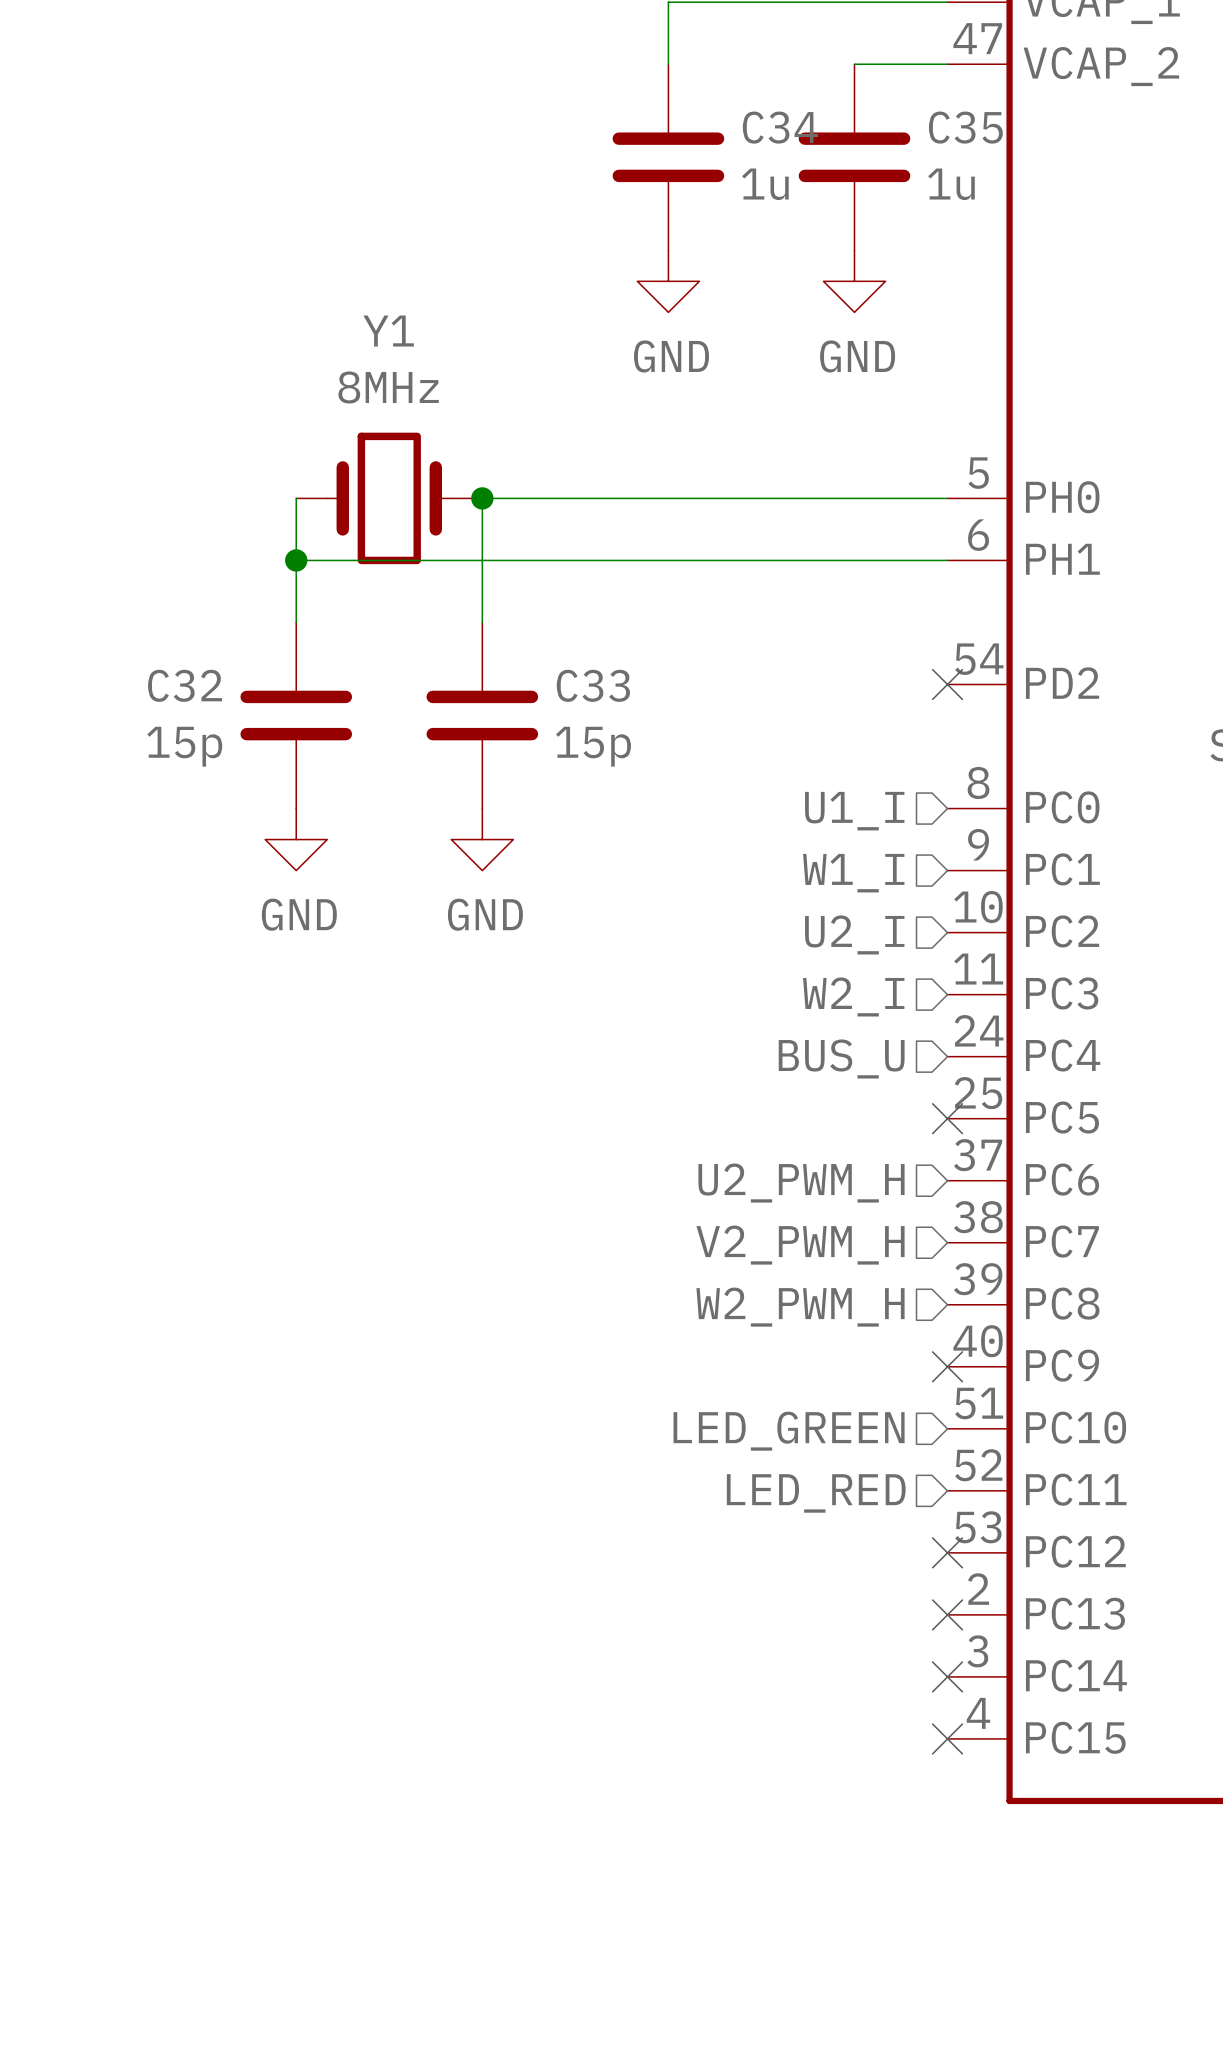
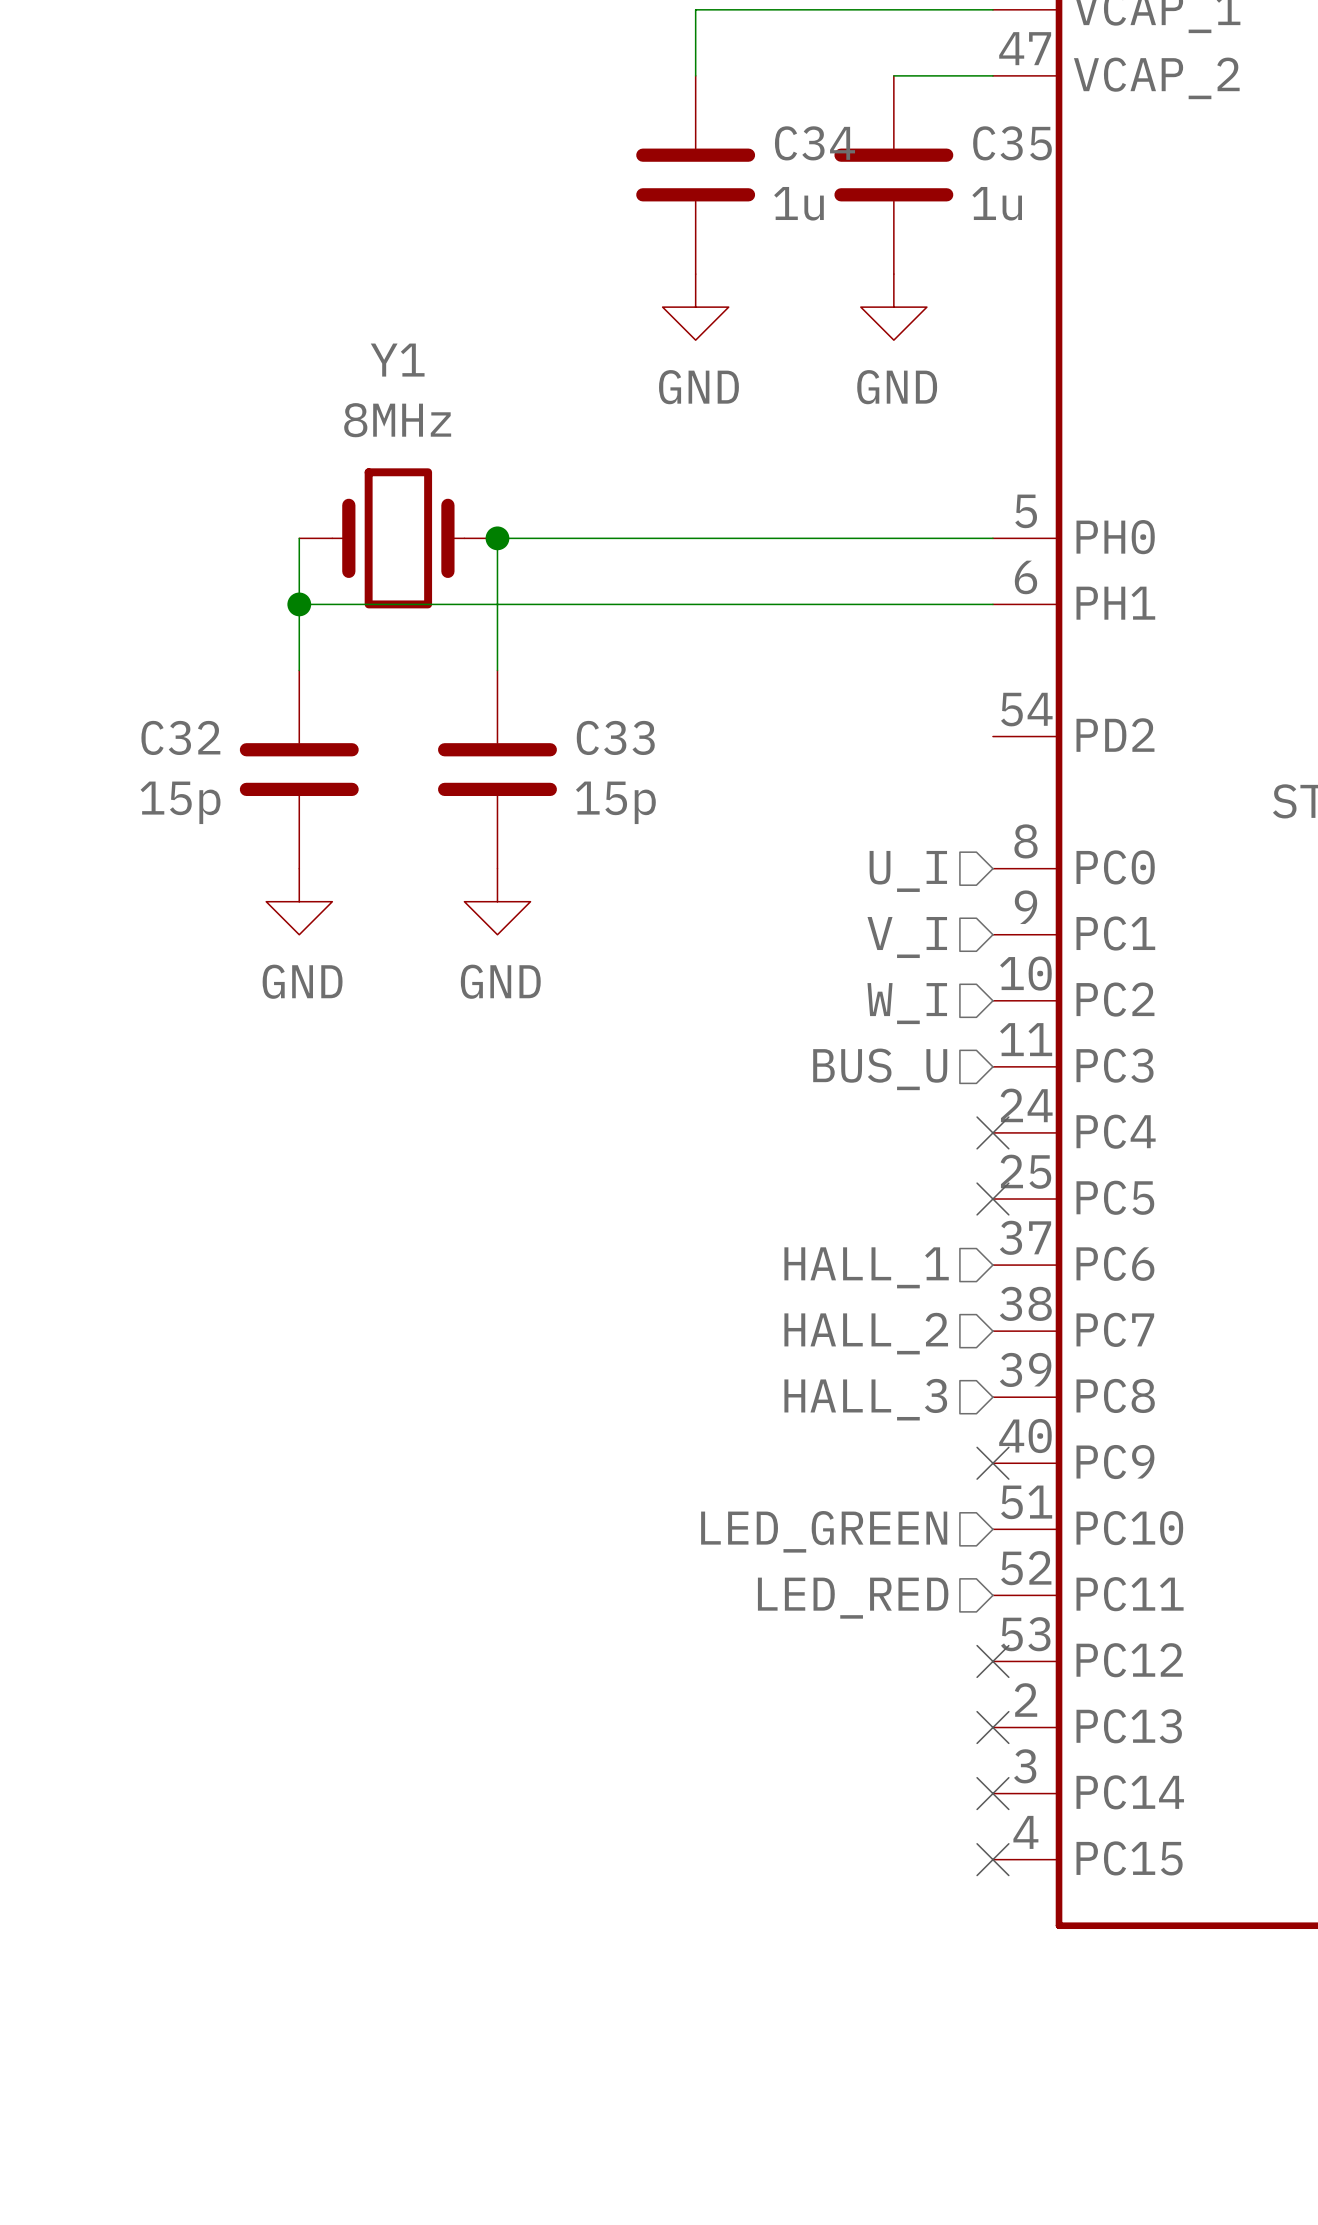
no-connect mark: (947, 684) -> none
hierarchical label: U1_I (854, 811) -> U_I (908, 871)
hierarchical label: W1_I (853, 873) -> V_I (907, 937)
hierarchical label: U2_I (854, 934) -> W_I (907, 1003)
hierarchical label: W2_I (853, 996) -> BUS_U (880, 1069)
no-connect mark: none -> (992, 1132)
hierarchical label: BUS_U (841, 1058) -> none
hierarchical label: U2_PWM_H (801, 1183) -> HALL_1 (866, 1267)
hierarchical label: V2_PWM_H (800, 1245) -> HALL_2 (866, 1333)
hierarchical label: W2_PWM_H (800, 1307) -> HALL_3 (865, 1399)

